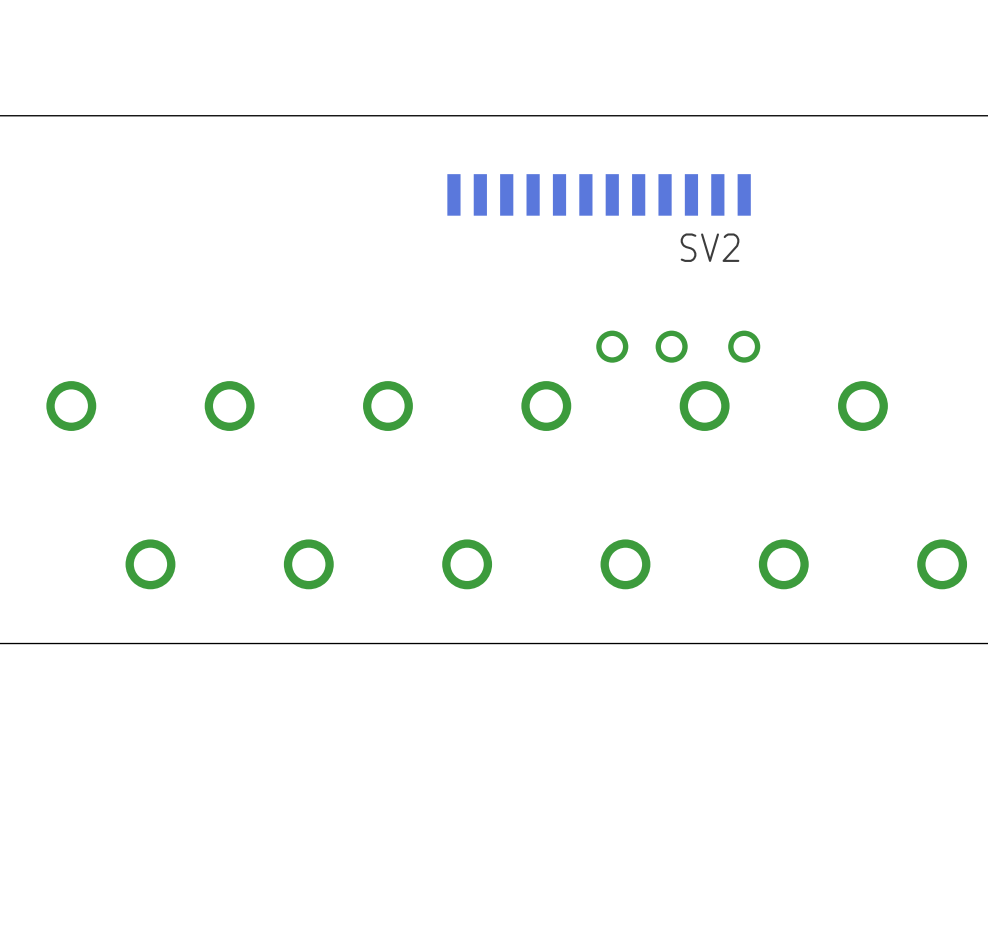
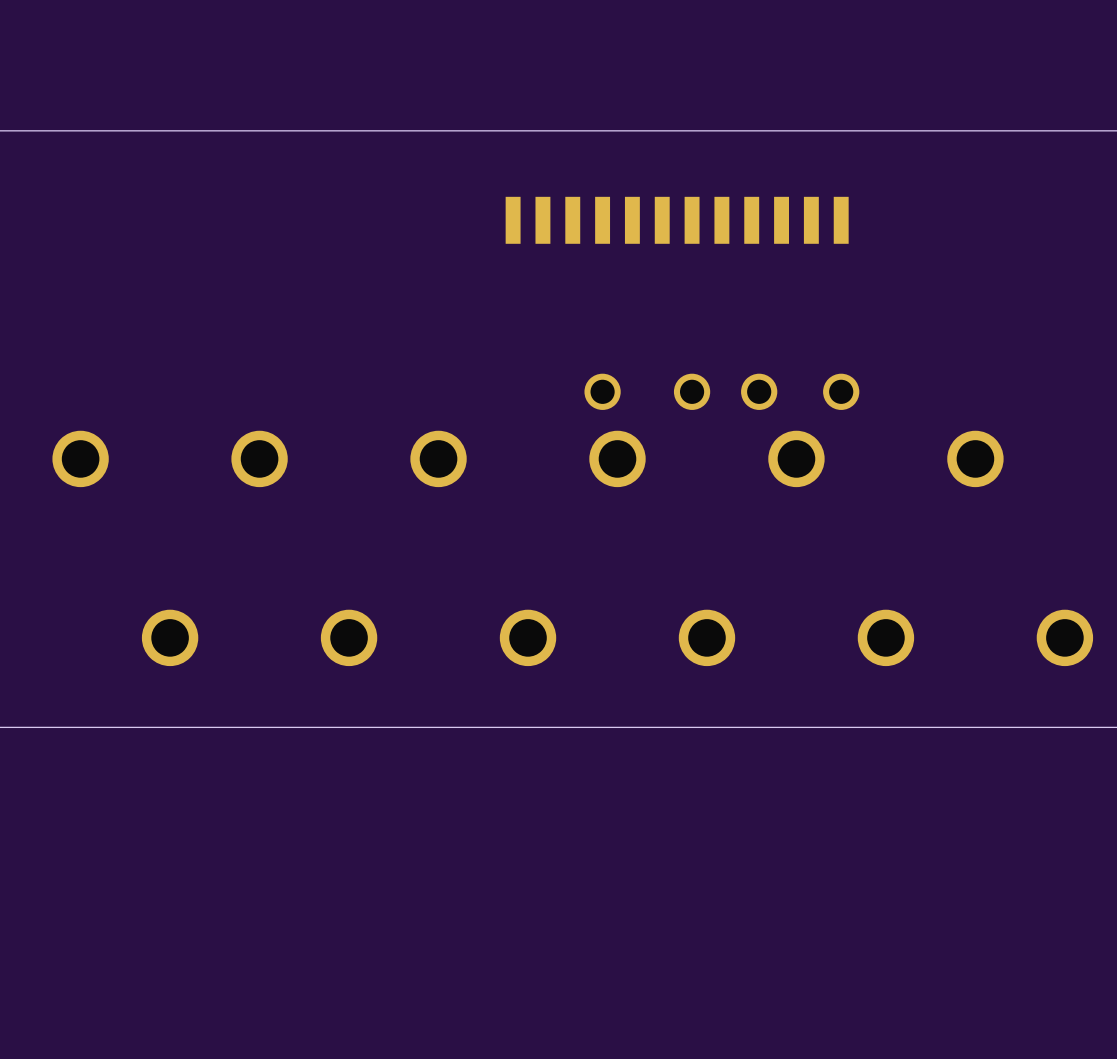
SV2 name: SV2 (710, 247) -> none
part: none -> (602, 391)

